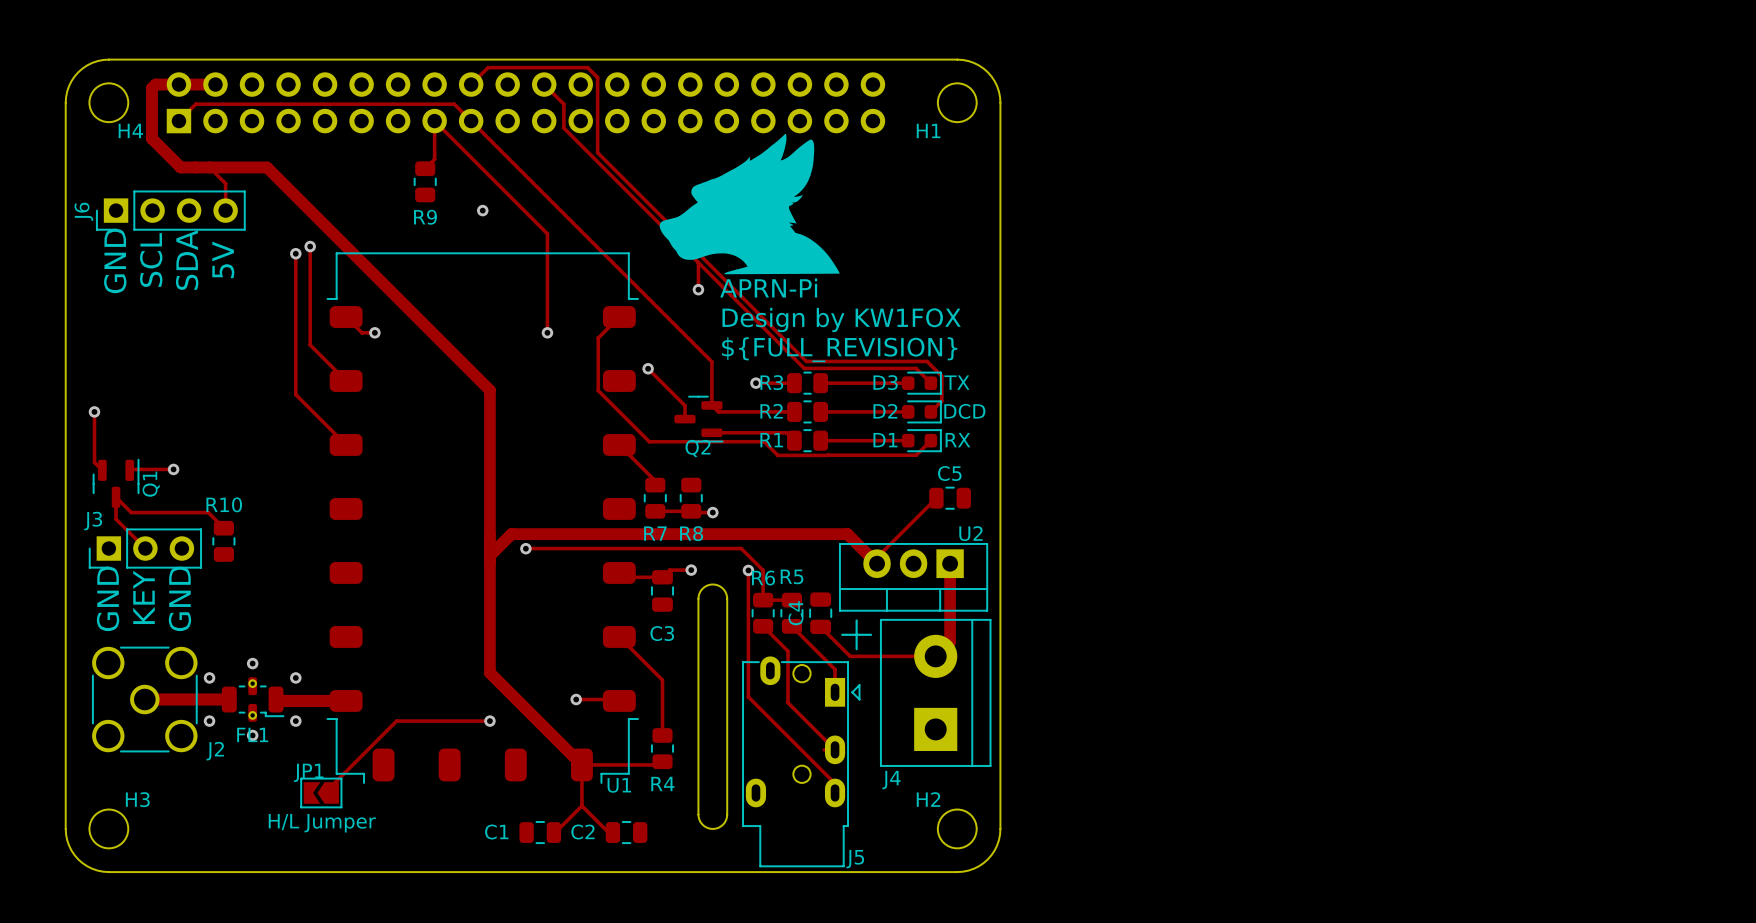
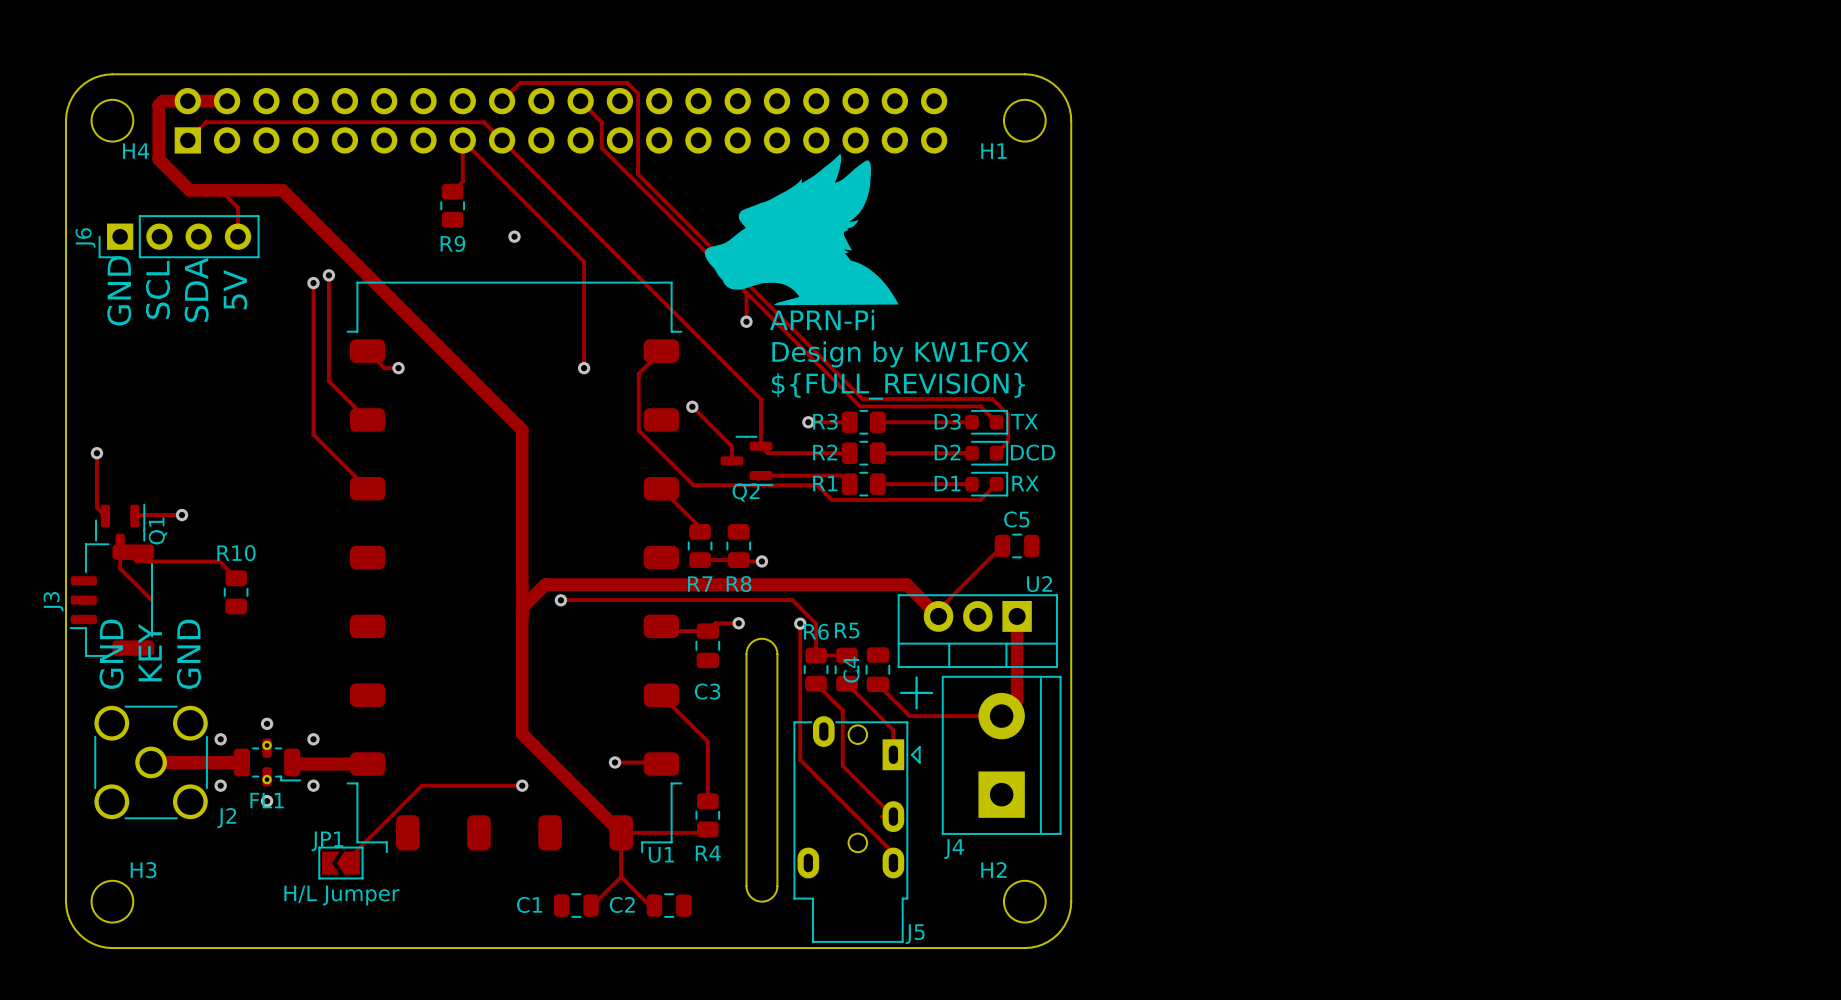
J3 name position: J3 (93, 521) -> J3 (53, 601)
J3 footprint: [88, 528, 202, 569] -> [69, 543, 155, 657]

